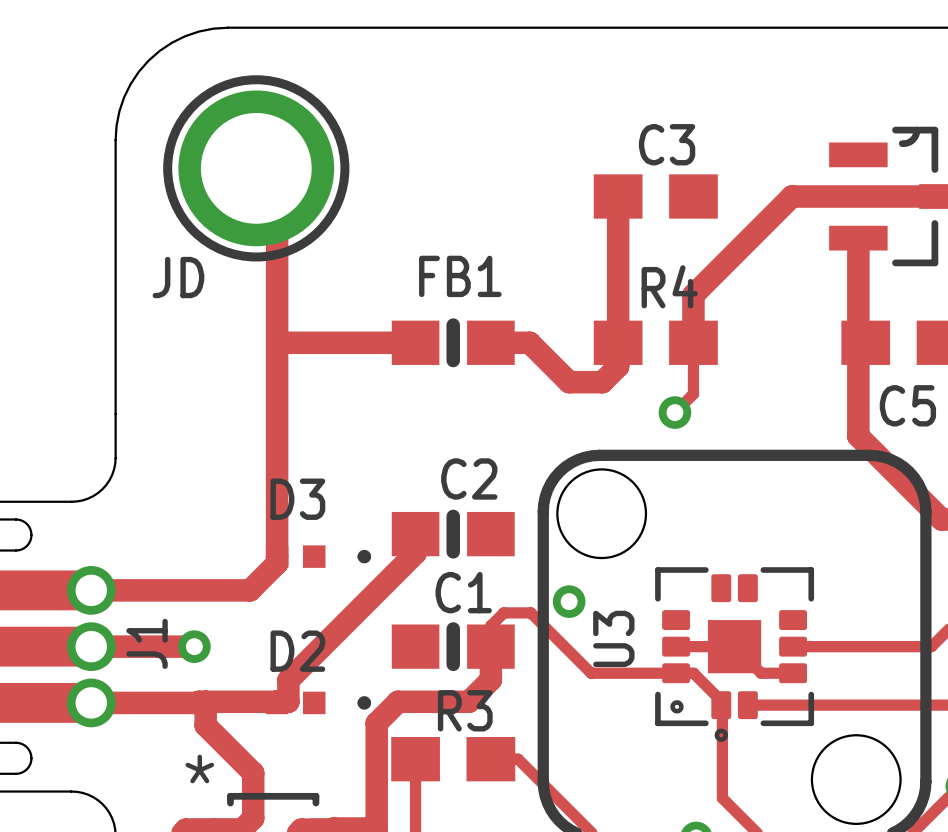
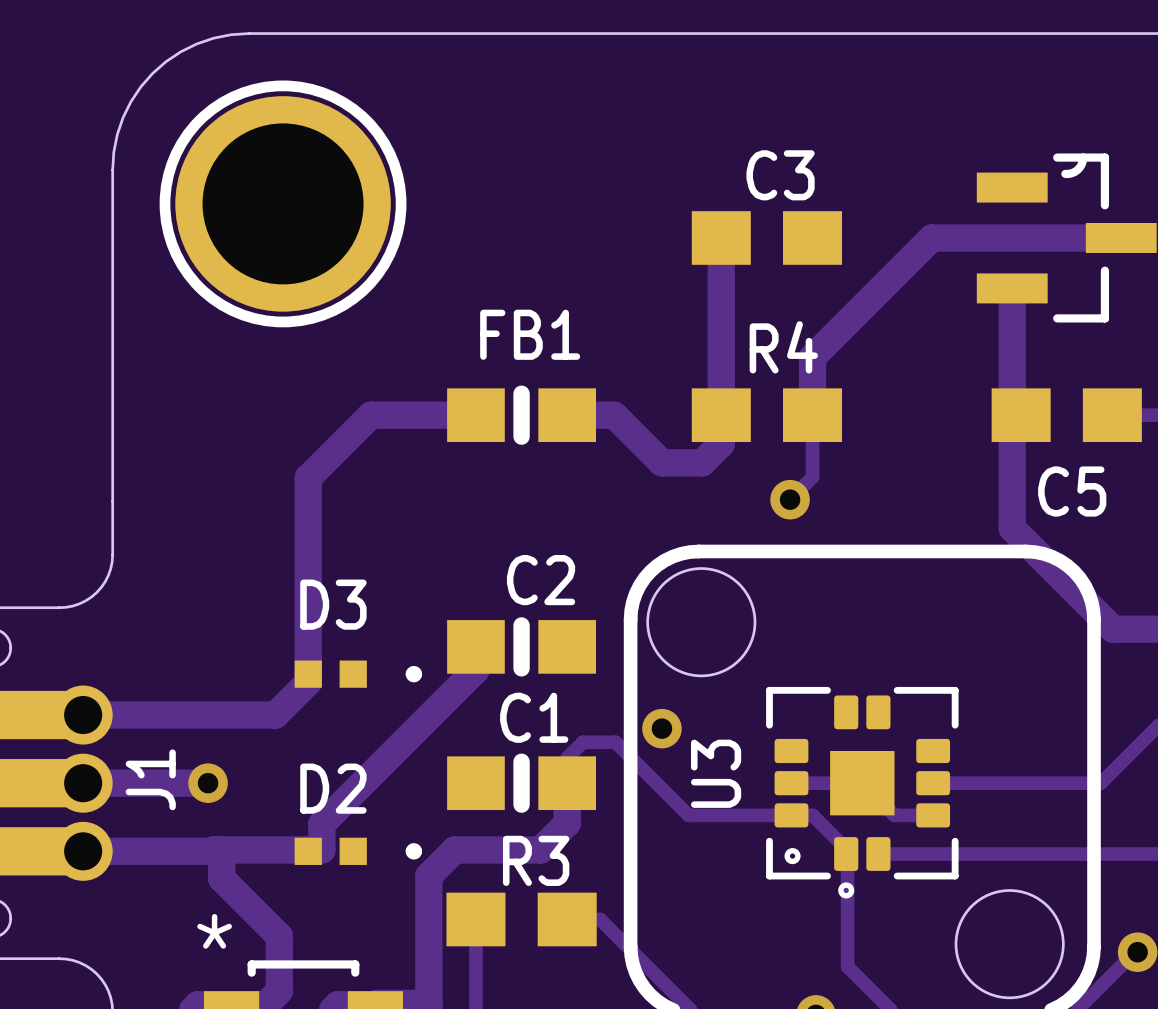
part footprint: [163, 75, 350, 262] -> [159, 80, 407, 328]
track: (256, 168) (277, 189) (277, 394) -> none
text: JD (178, 277) -> none
track: (277, 342) (328, 342) -> (308, 477) (371, 415)

